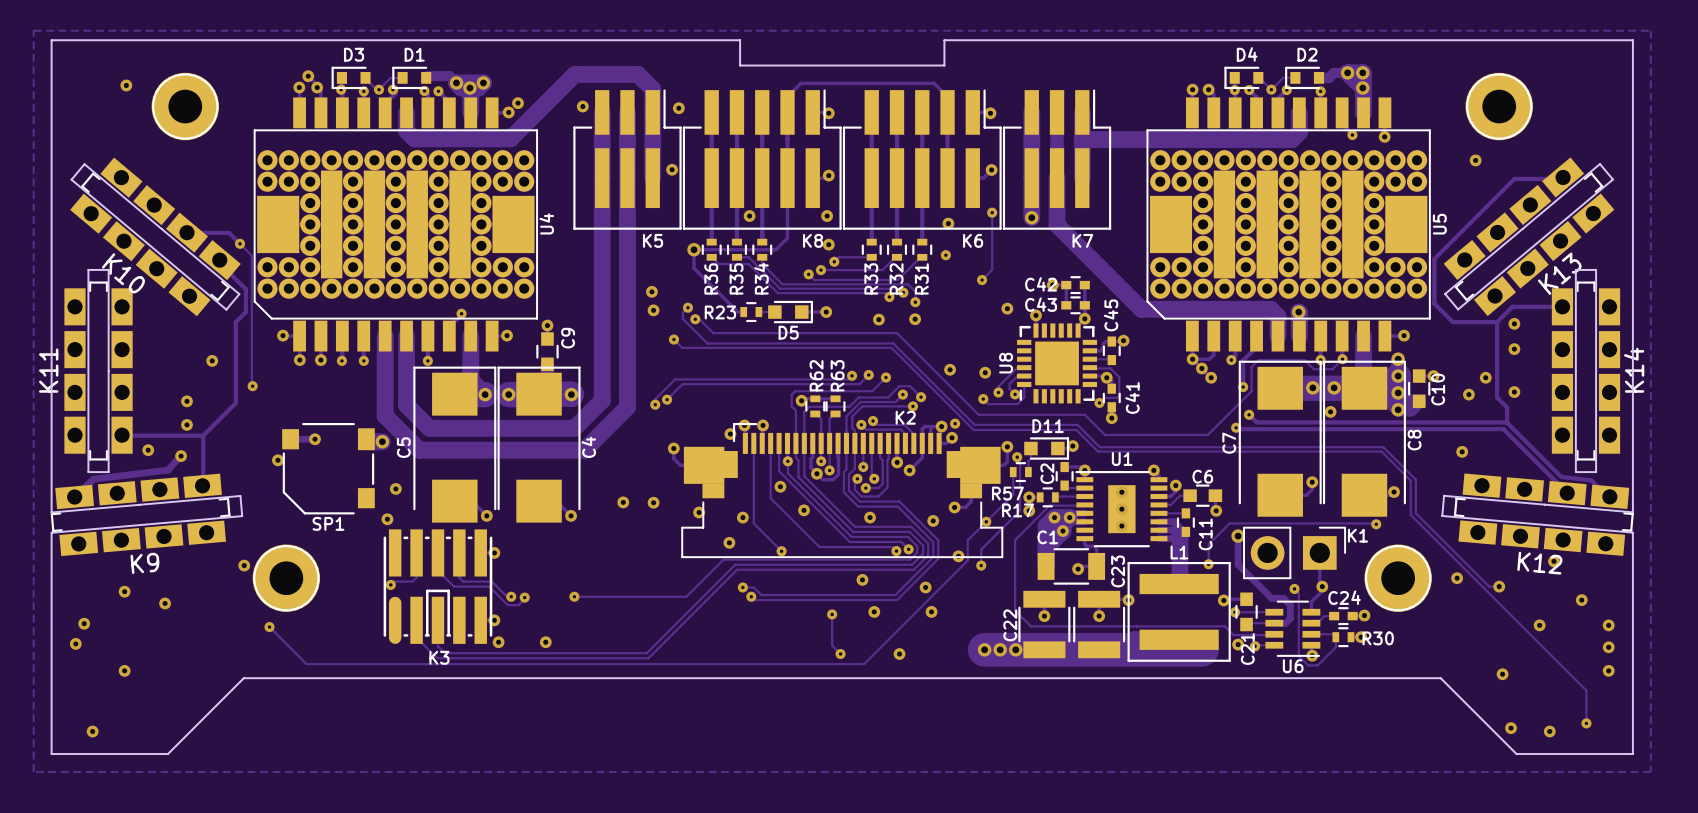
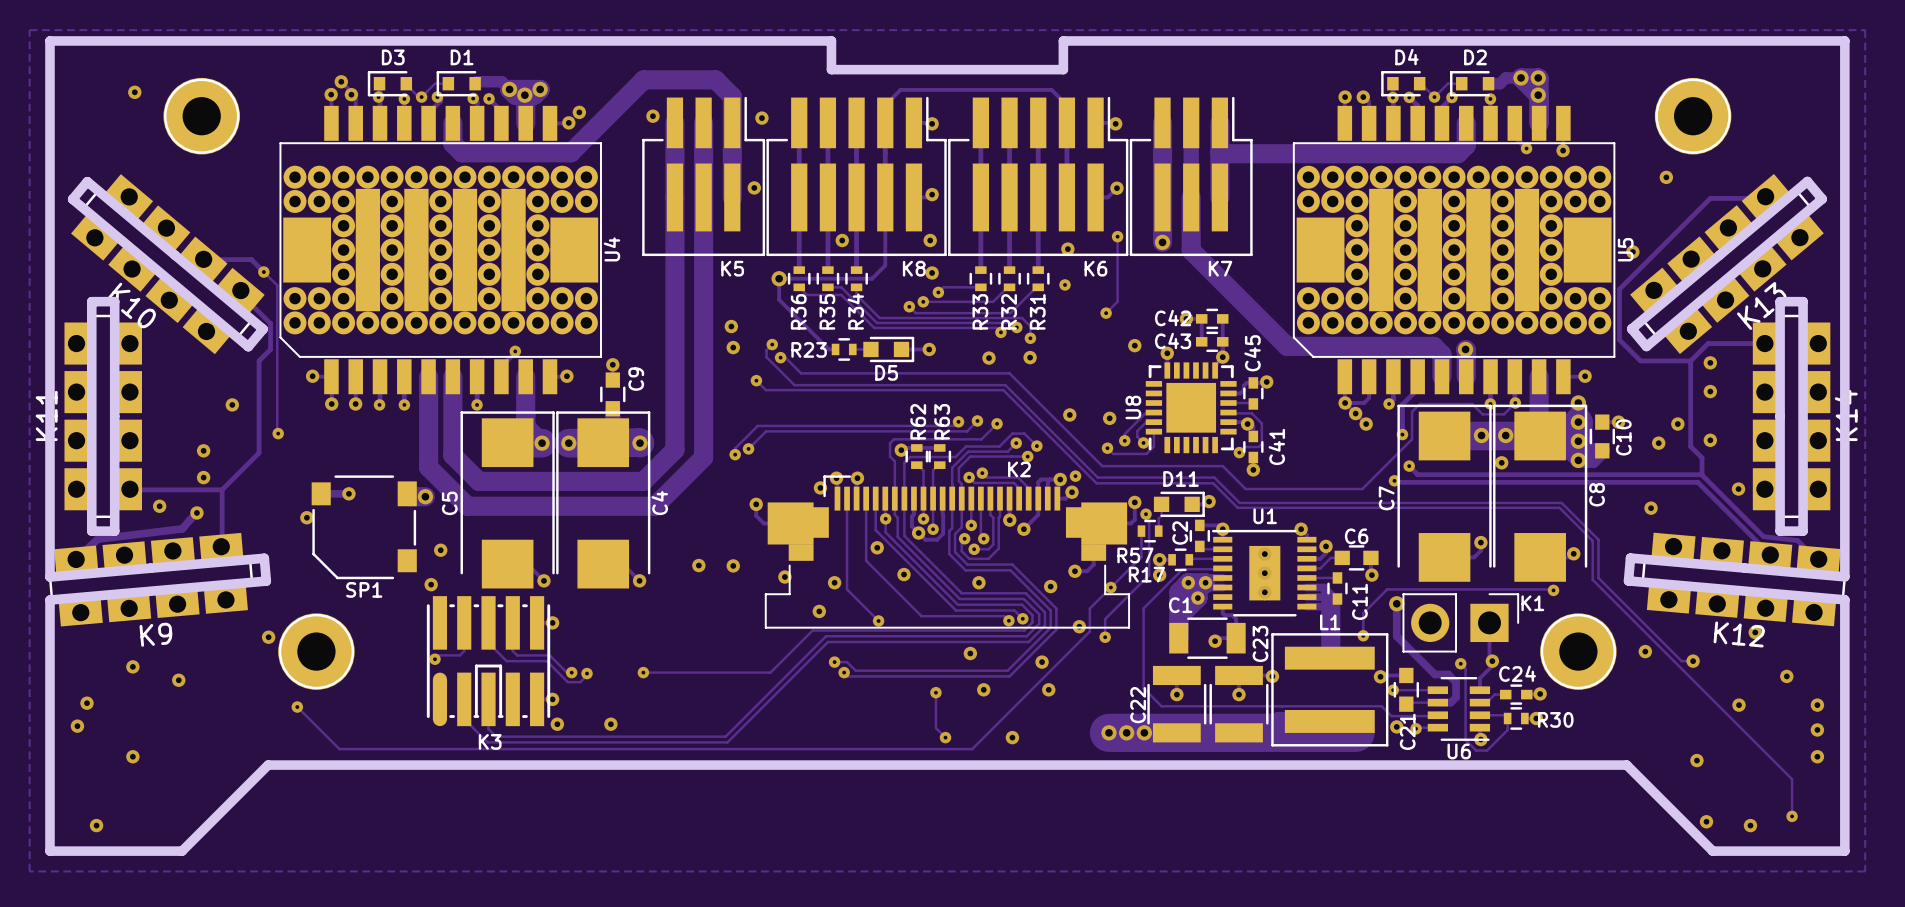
board edge width: thin (51, 40) (51, 512) (240, 495) (242, 516) (51, 532) (51, 754) (167, 754) (243, 678) (1440, 678) (1516, 754) (1632, 754) (1632, 532) (1442, 515) (1444, 495) (1632, 512) (1632, 40) (944, 40) (944, 65) (740, 65) (740, 40) (51, 40) -> thick (49, 40) (49, 577) (264, 558) (266, 581) (49, 600) (49, 851) (182, 851) (268, 765) (1626, 765) (1712, 851) (1844, 851) (1844, 599) (1628, 580) (1630, 558) (1844, 576) (1844, 40) (1063, 40) (1063, 69) (831, 69) (831, 40) (49, 40)
board edge width: thin (84, 164) (239, 294) (226, 309) (71, 179) (84, 164) -> thick (87, 181) (263, 329) (248, 346) (72, 199) (87, 181)
board edge width: thin (1599, 164) (1612, 179) (1458, 309) (1445, 293) (1599, 164) -> thick (1807, 181) (1822, 199) (1646, 346) (1631, 328) (1807, 181)
via: none -> (1632, 251)
board edge width: thin (88, 269) (108, 269) (108, 472) (88, 472) (88, 269) -> thick (91, 301) (114, 301) (114, 531) (91, 531) (91, 301)
board edge width: thin (1575, 269) (1575, 472) (1596, 472) (1596, 269) (1575, 269) -> thick (1780, 301) (1780, 531) (1803, 531) (1803, 301) (1780, 301)
via: none -> (1738, 489)

